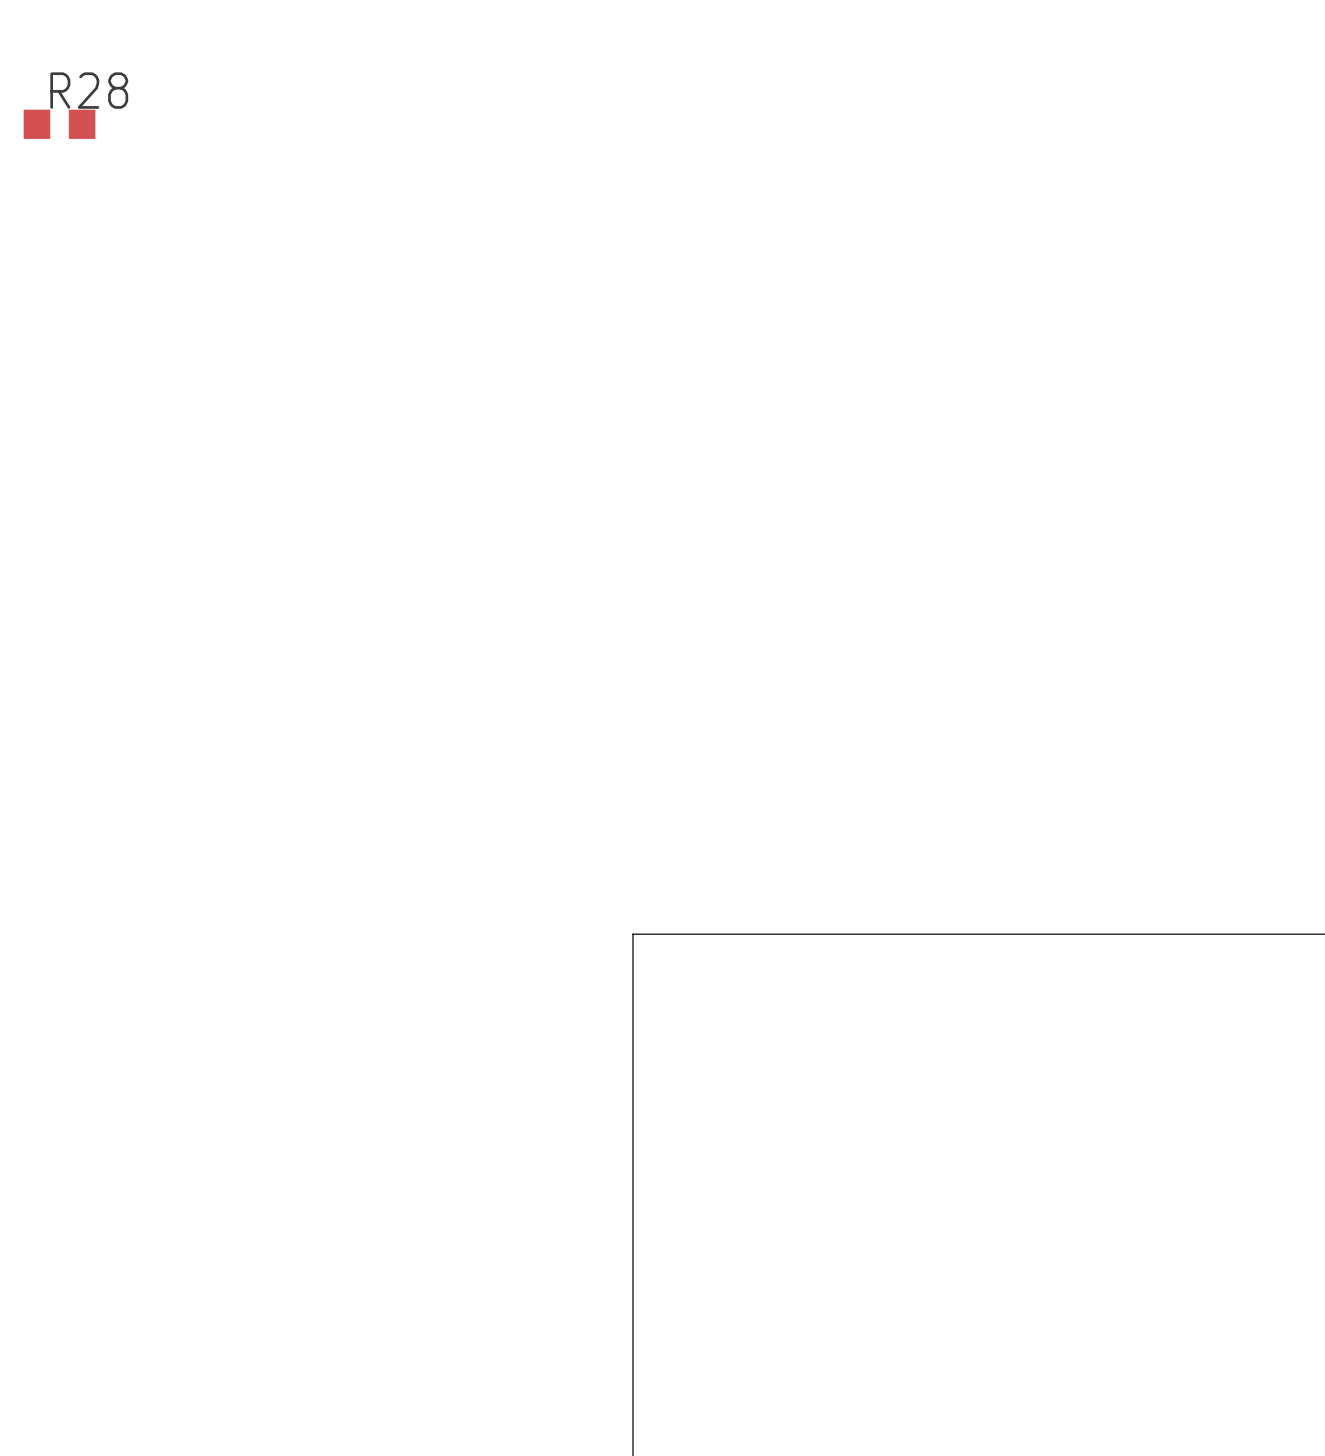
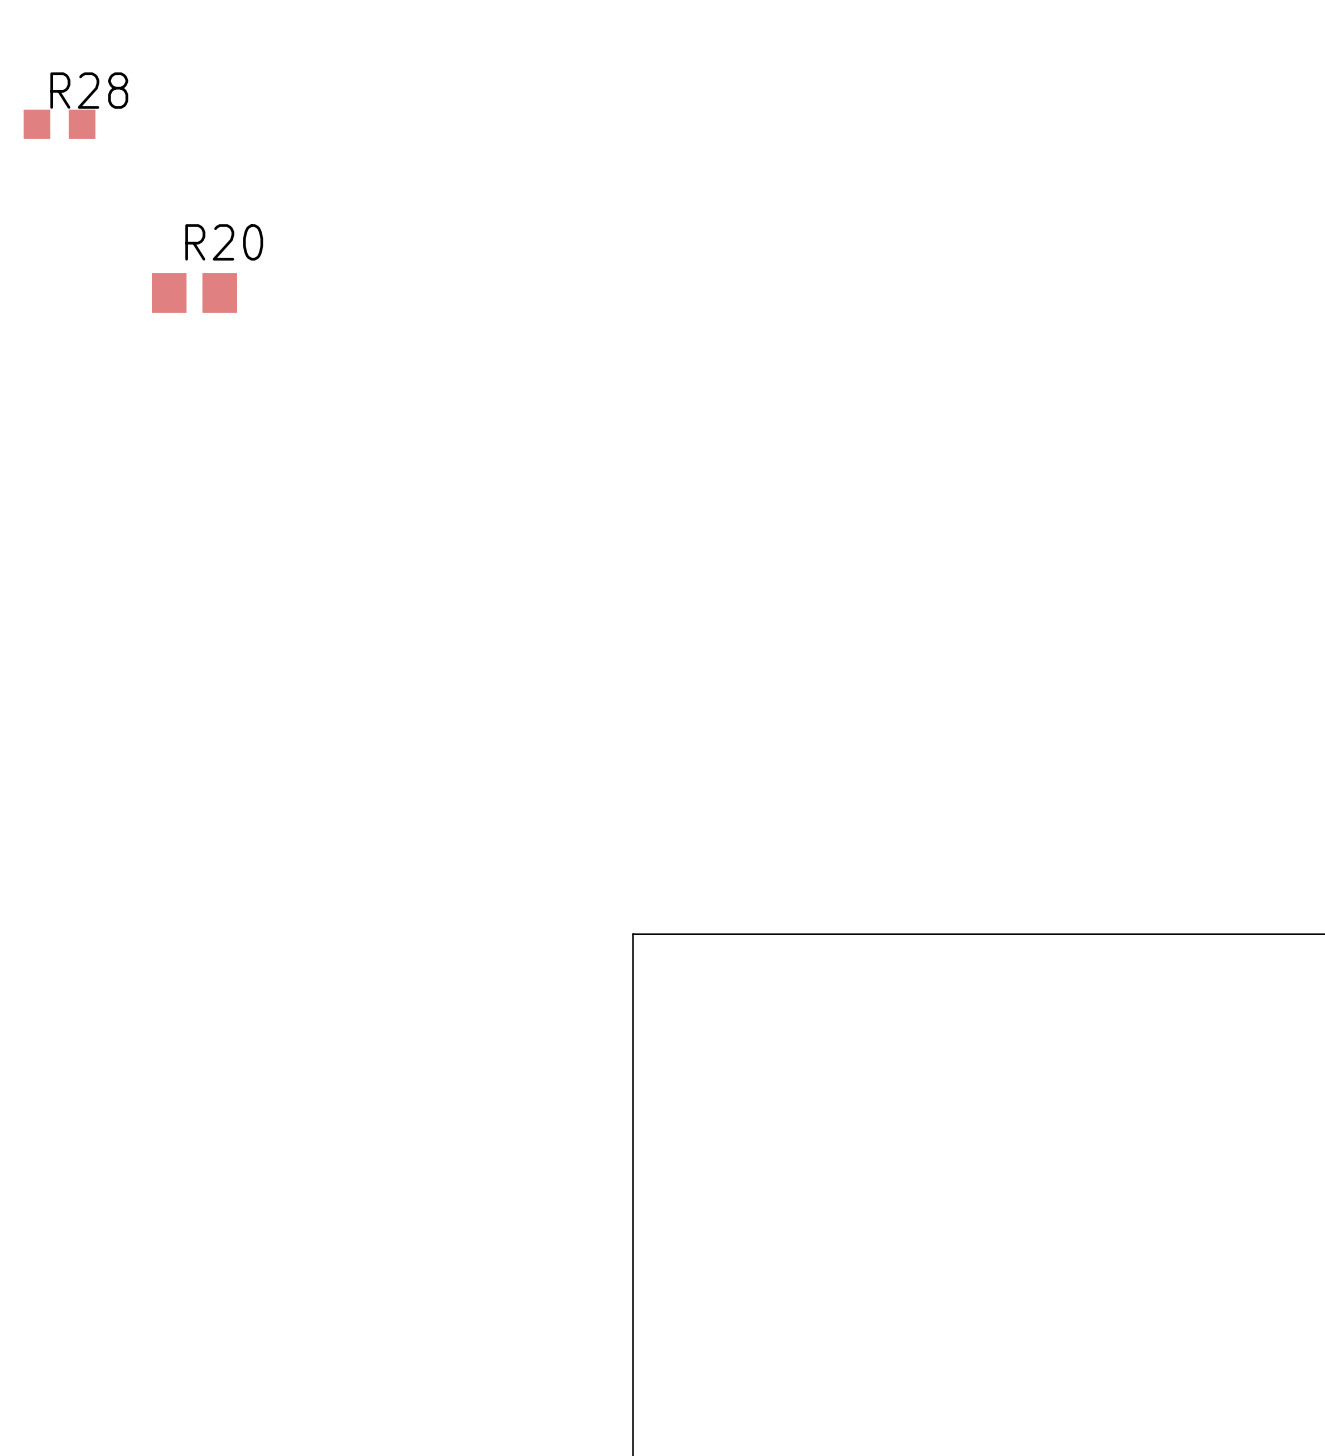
R20: none -> (194, 292)

